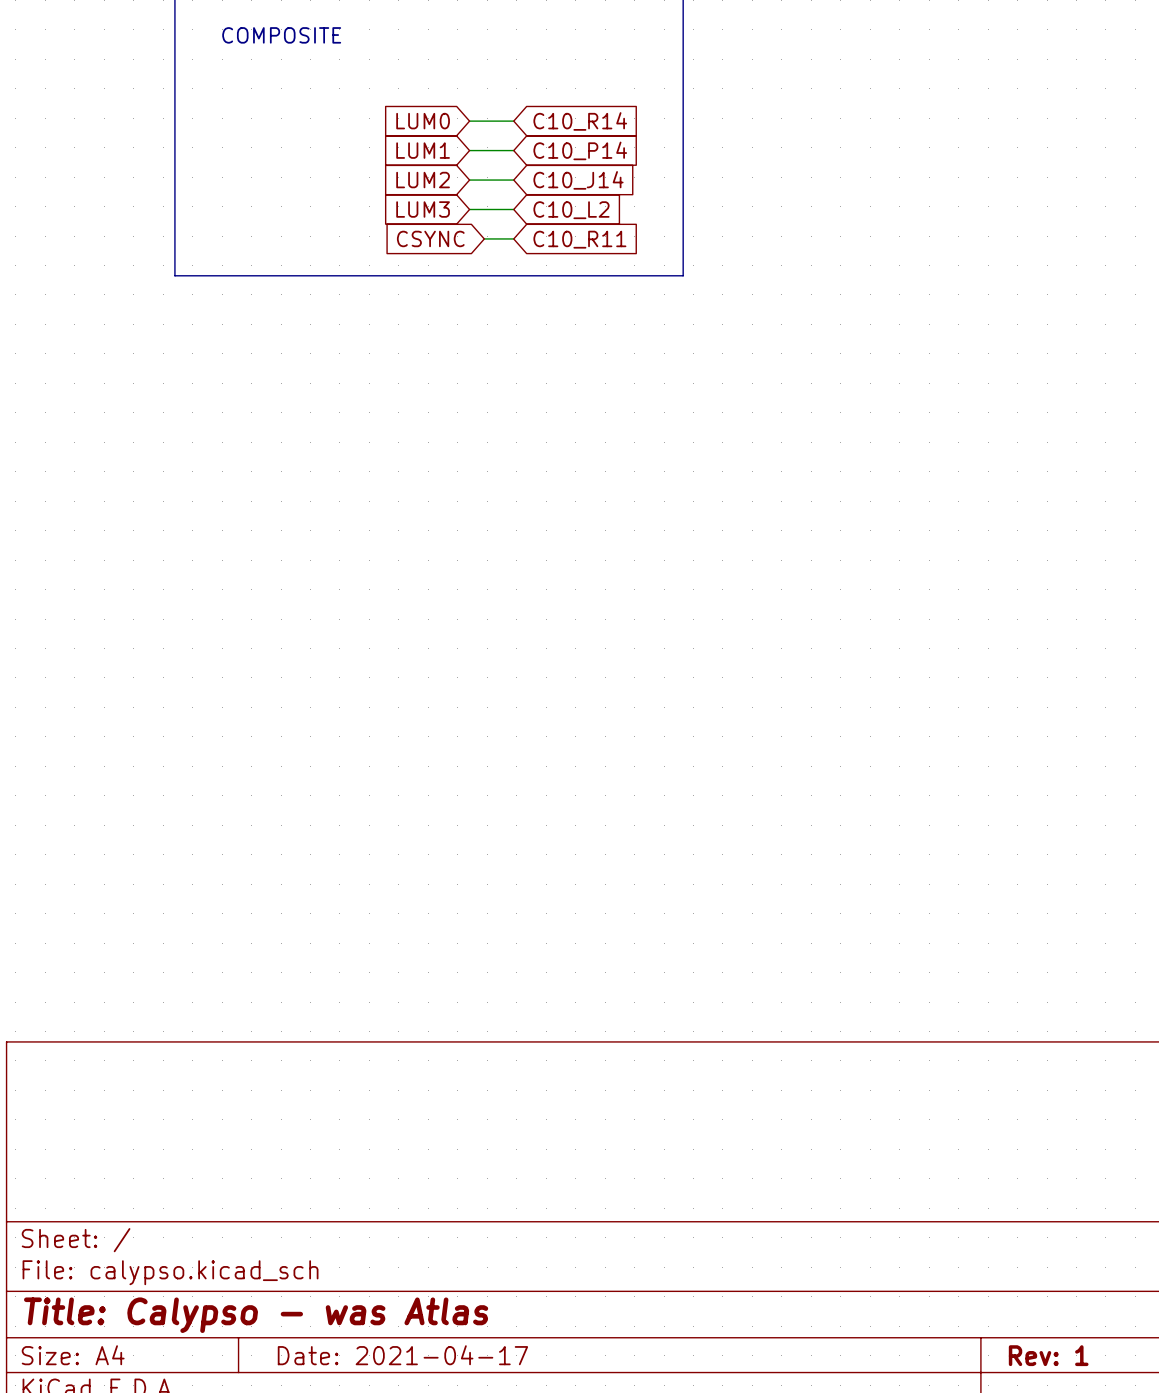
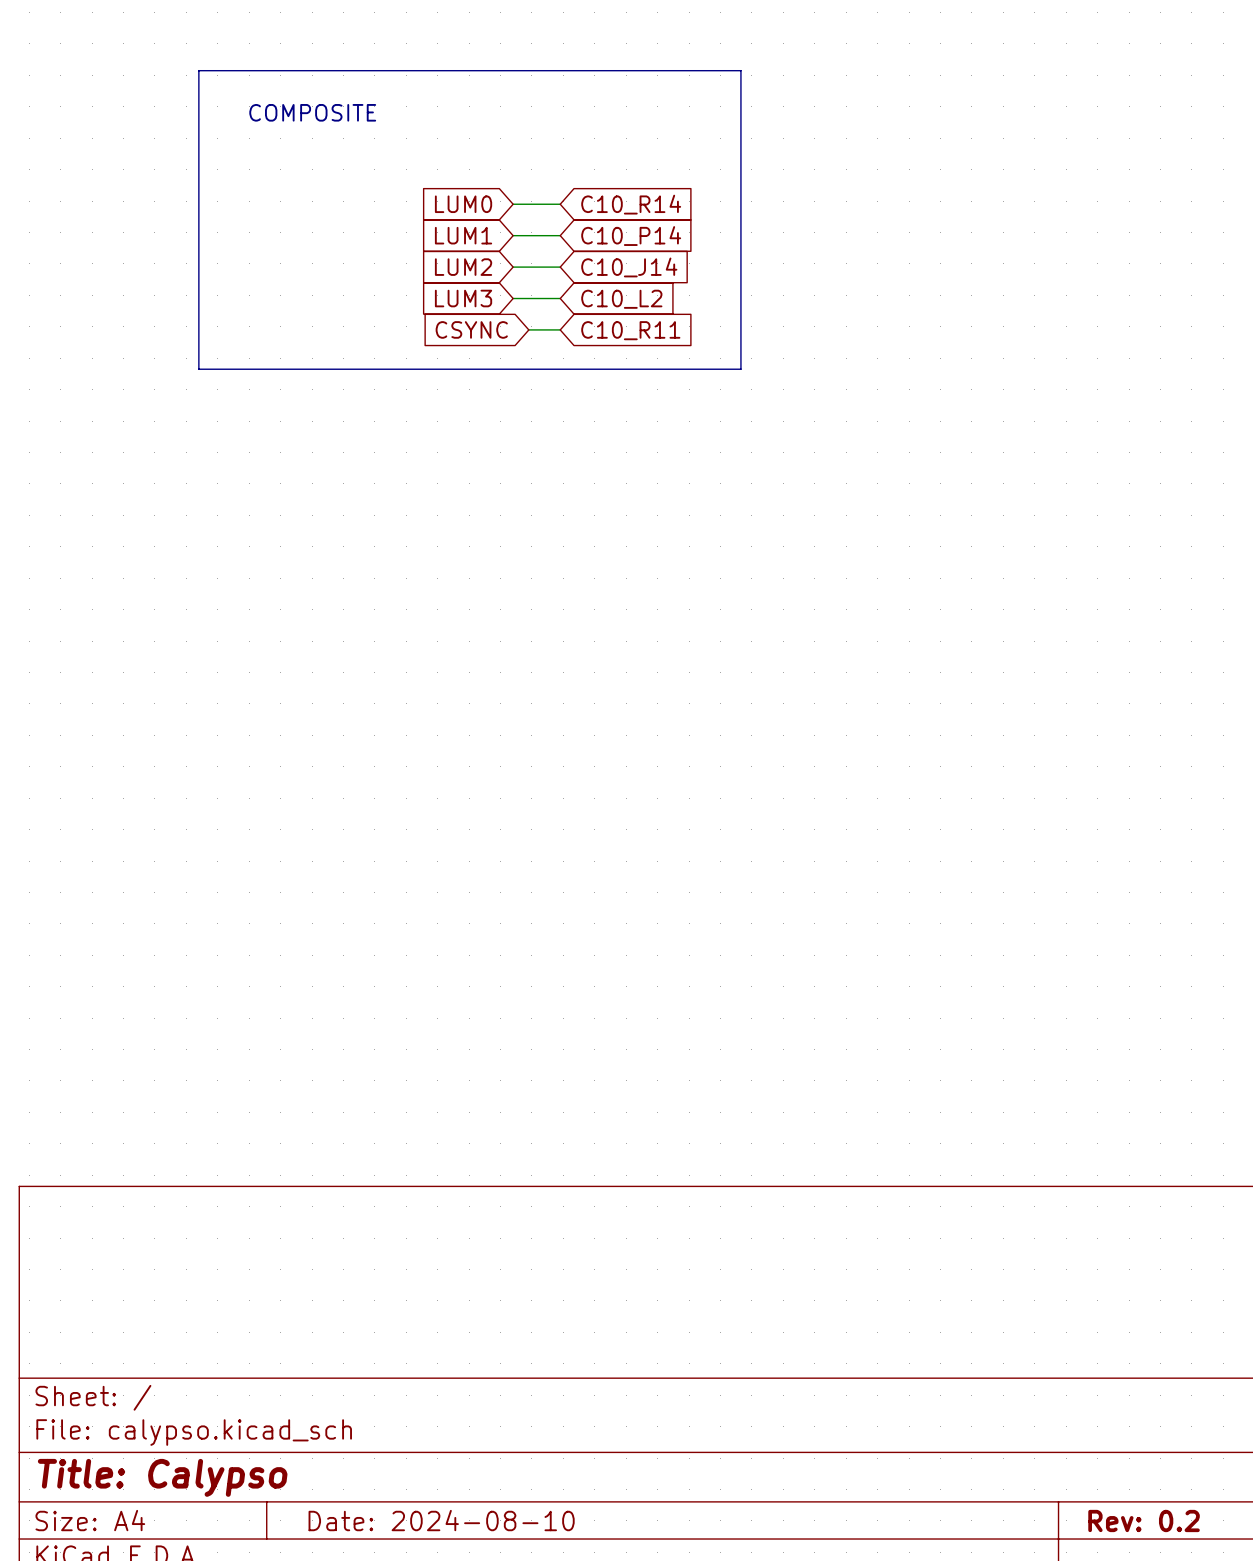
title block: Title: Calypso - was Atlas (256, 1315) -> Title: Calypso (162, 1477)
title block: Date: 2021-04-17 (402, 1355) -> Date: 2024-08-10 (441, 1520)
title block: Rev: 1 (1048, 1355) -> Rev: 0.2 (1144, 1520)

